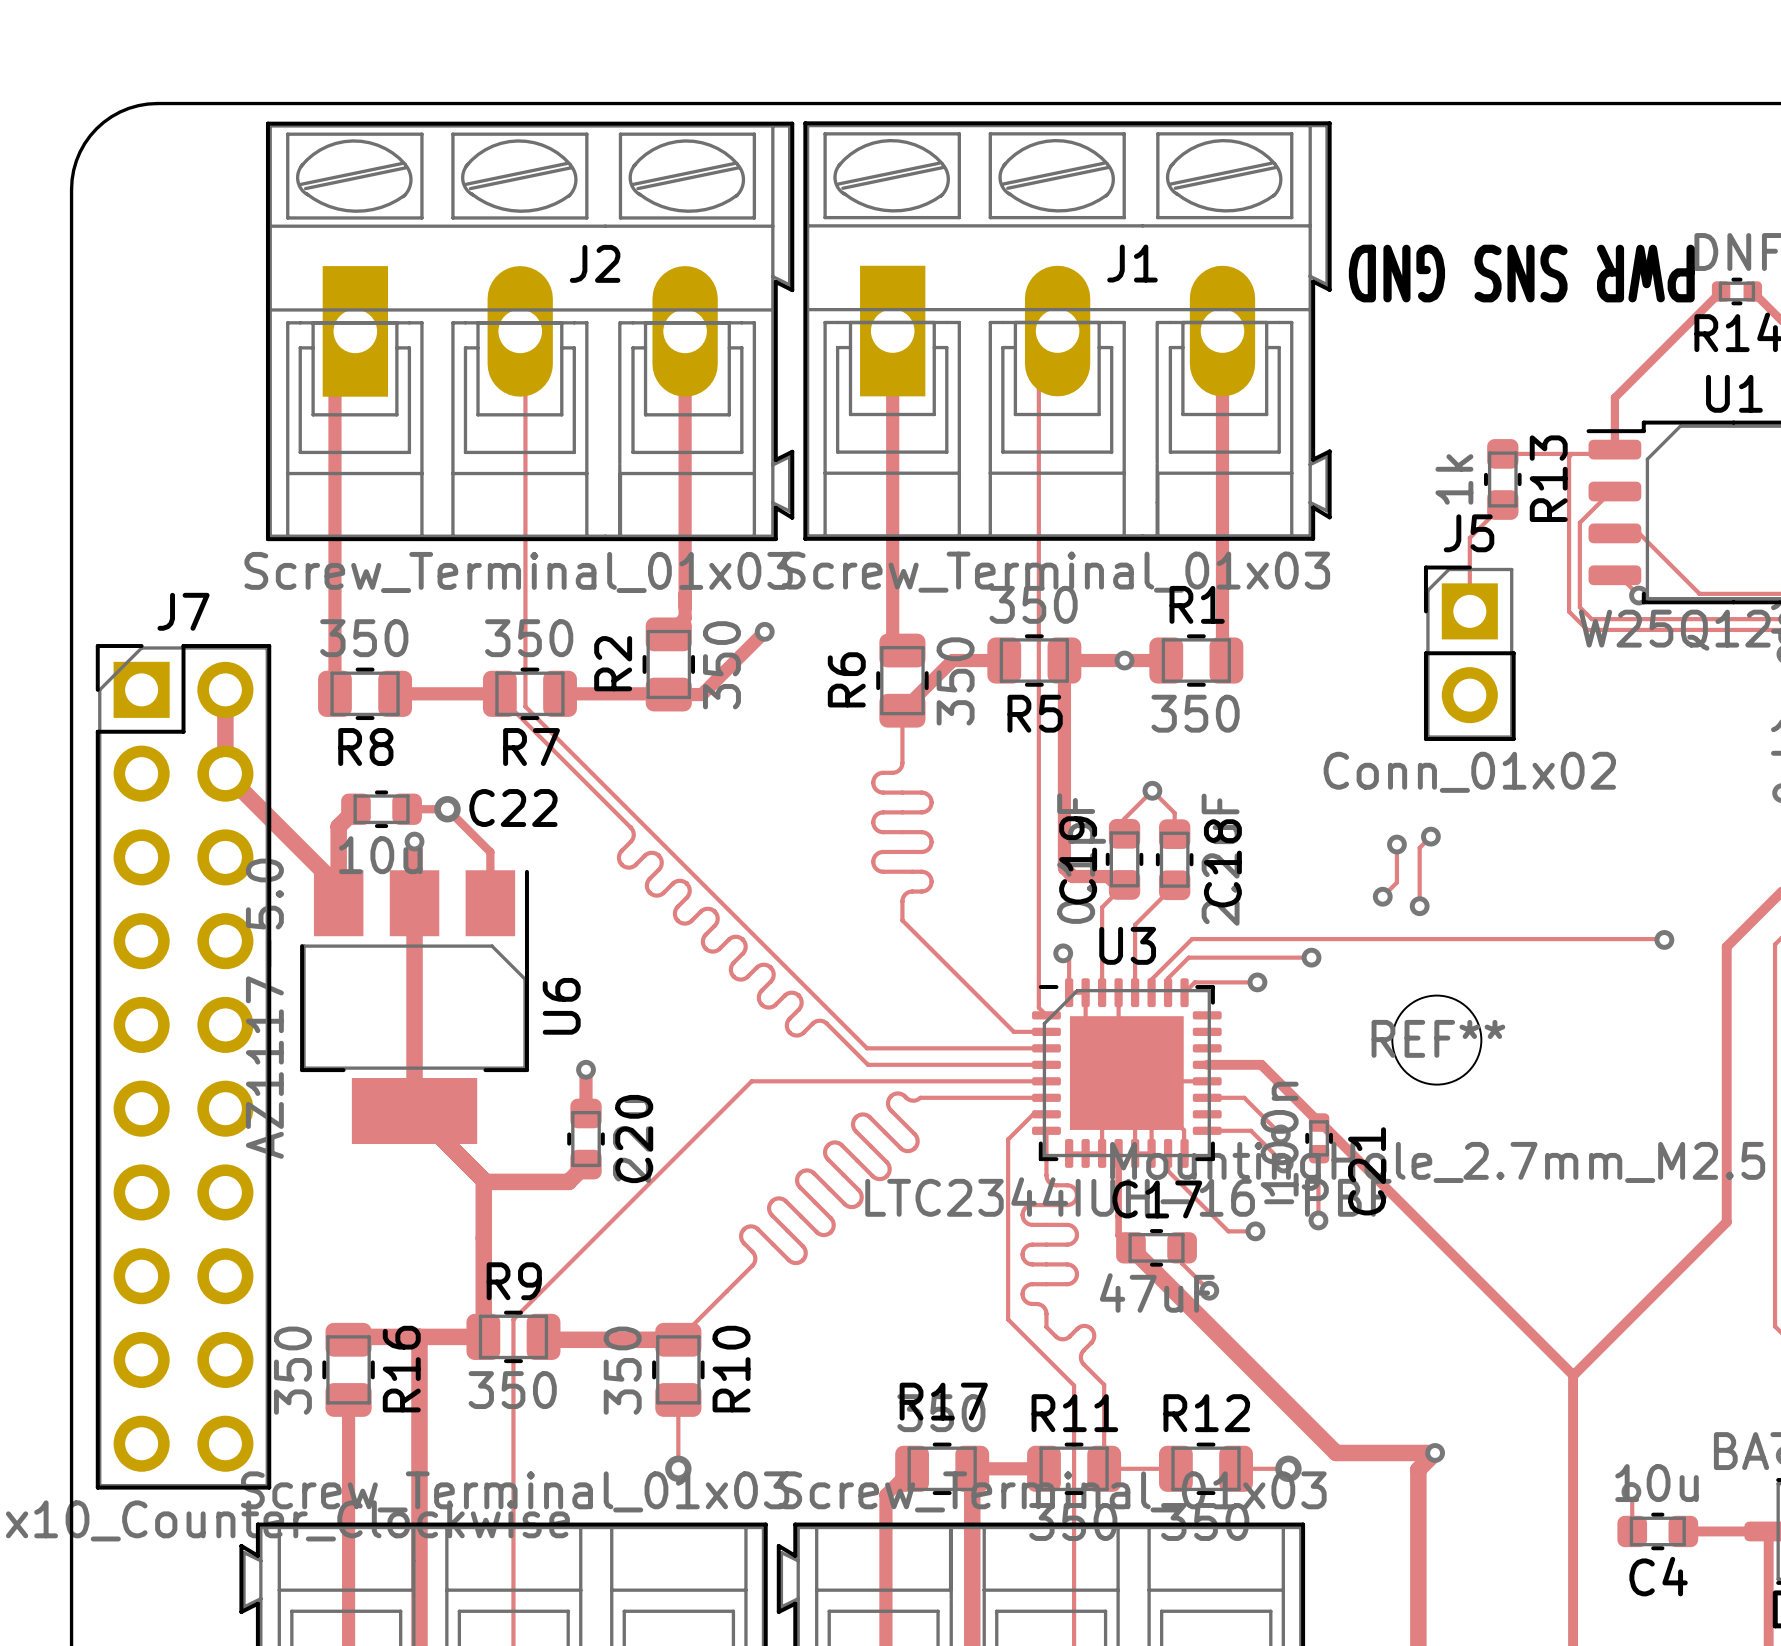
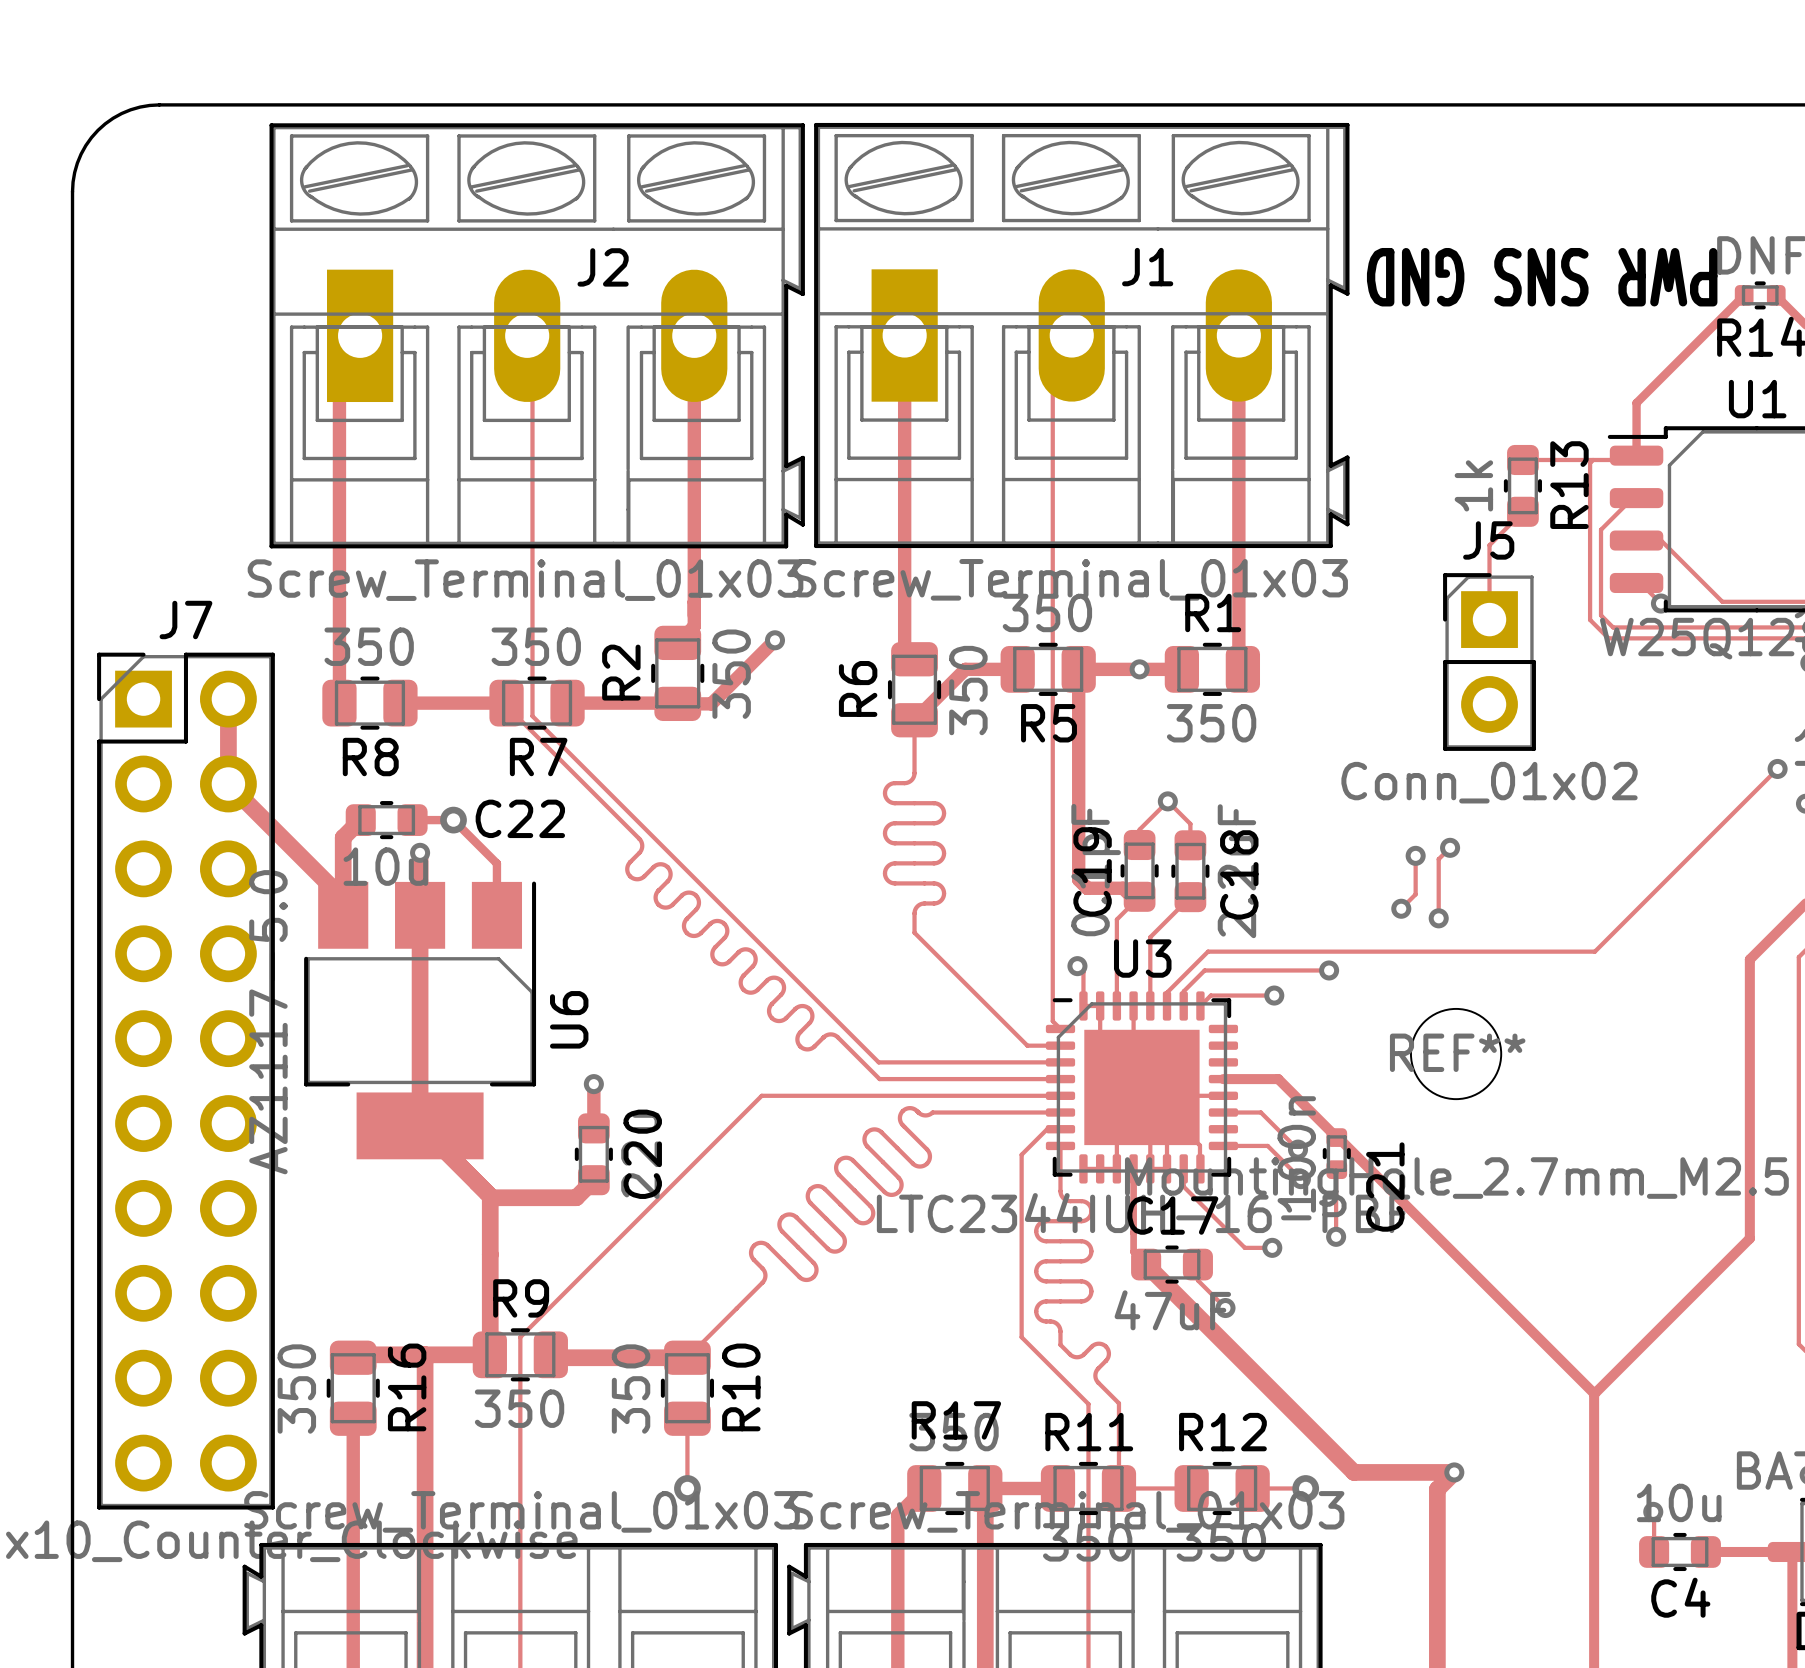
via: none -> (1777, 768)
track: (1573, 939) (1664, 939) -> (1594, 951) (1777, 768)
via: (1664, 939) -> none

